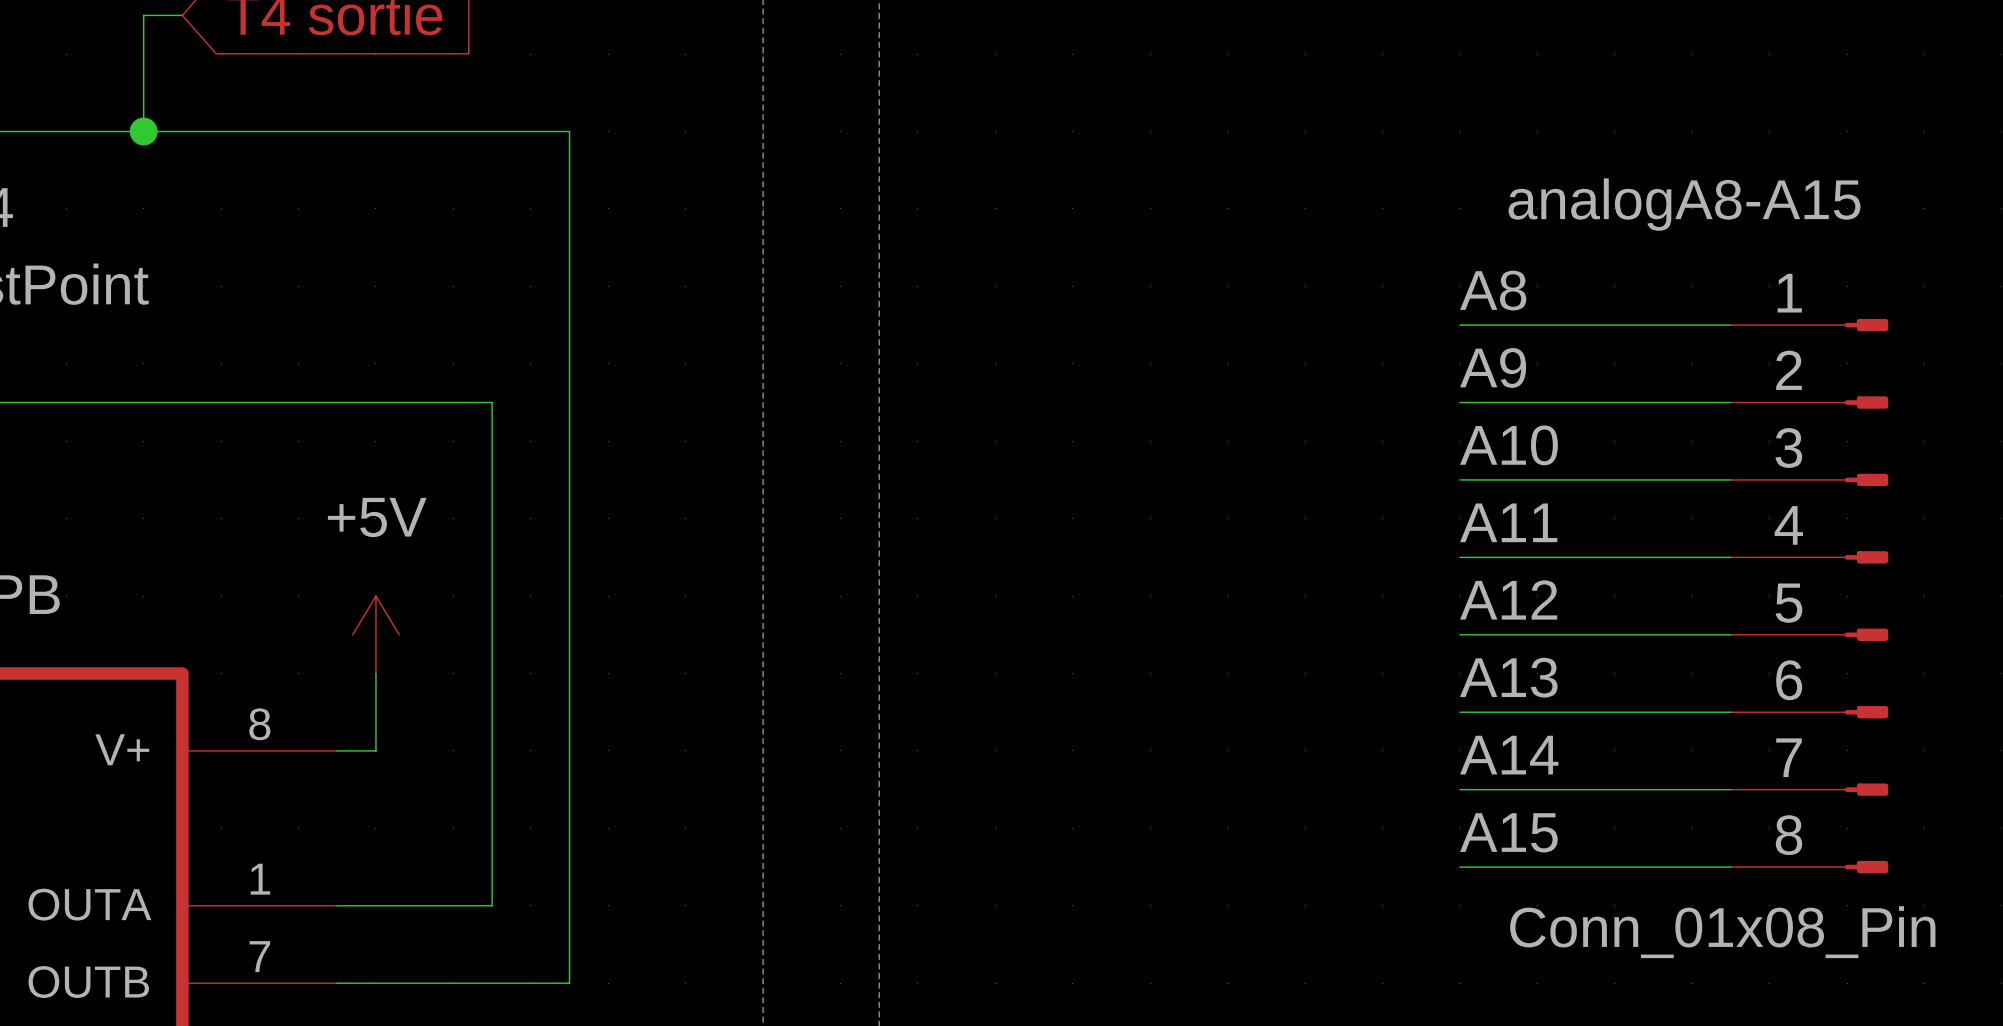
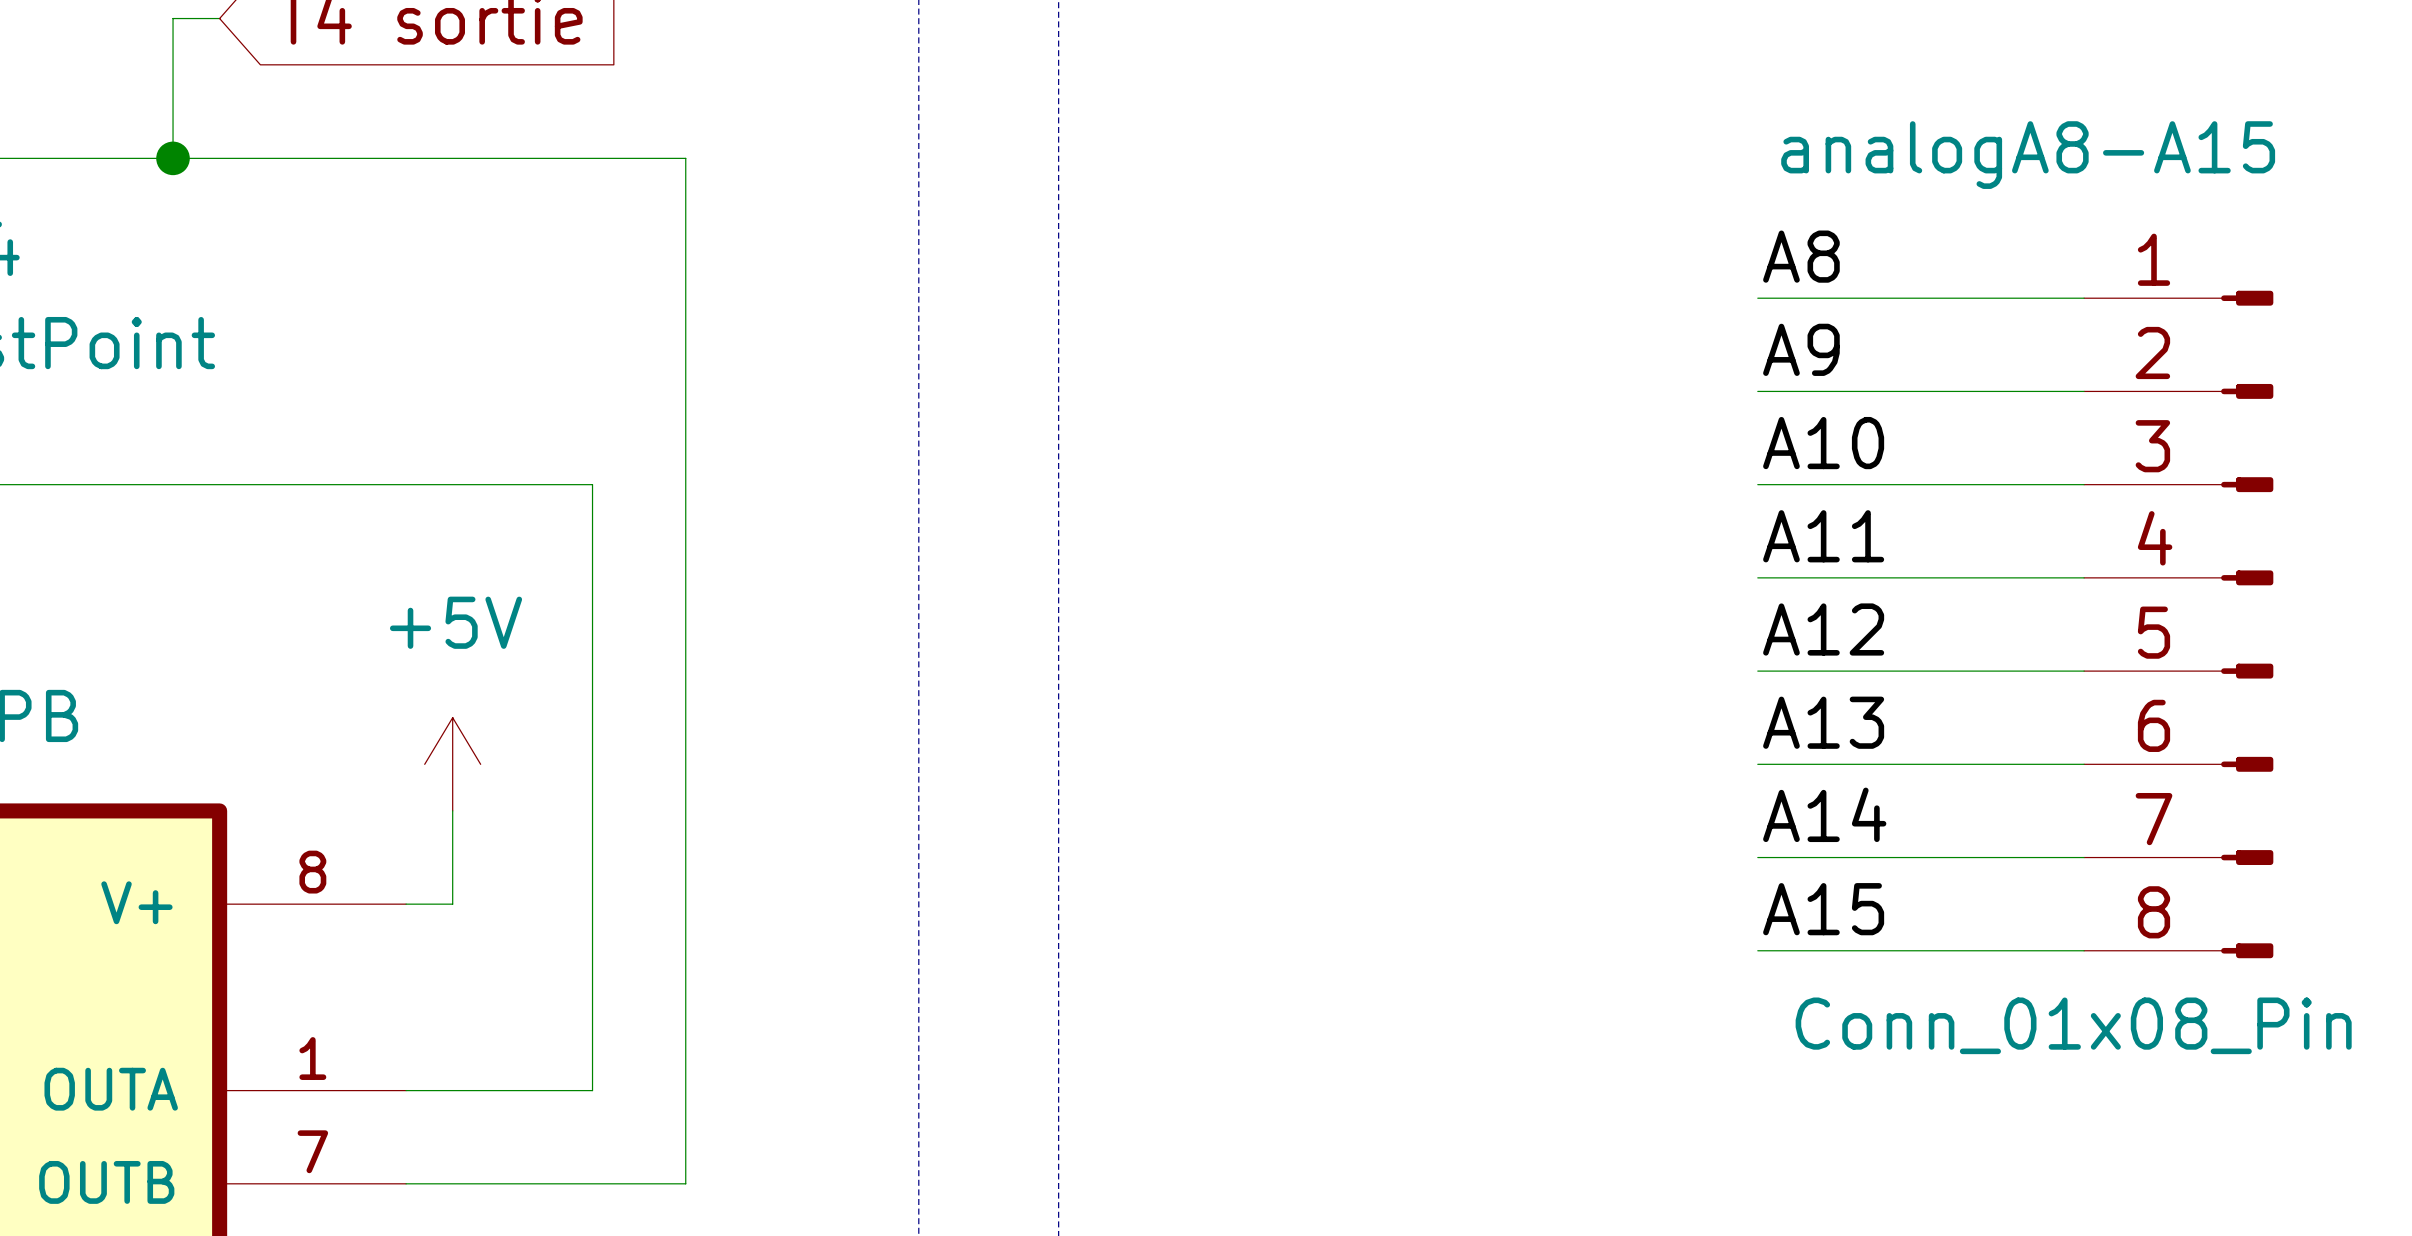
label: none -> A8 (1801, 256)
label: A8 (1493, 290) -> A9 (1801, 349)
label: A9 (1493, 367) -> A10 (1823, 443)
label: A10 (1508, 445) -> A11 (1823, 536)
label: A11 (1508, 522) -> A12 (1823, 629)
analogA8-A15 position: (1809, 596) -> (2178, 624)
label: A12 (1508, 599) -> A13 (1823, 722)
label: A13 (1508, 677) -> A14 (1824, 814)
label: A14 (1509, 755) -> A15 (1823, 909)
label: A15 (1508, 832) -> none
wire: (1459, 867) (1730, 867) -> (1757, 298) (2084, 298)

